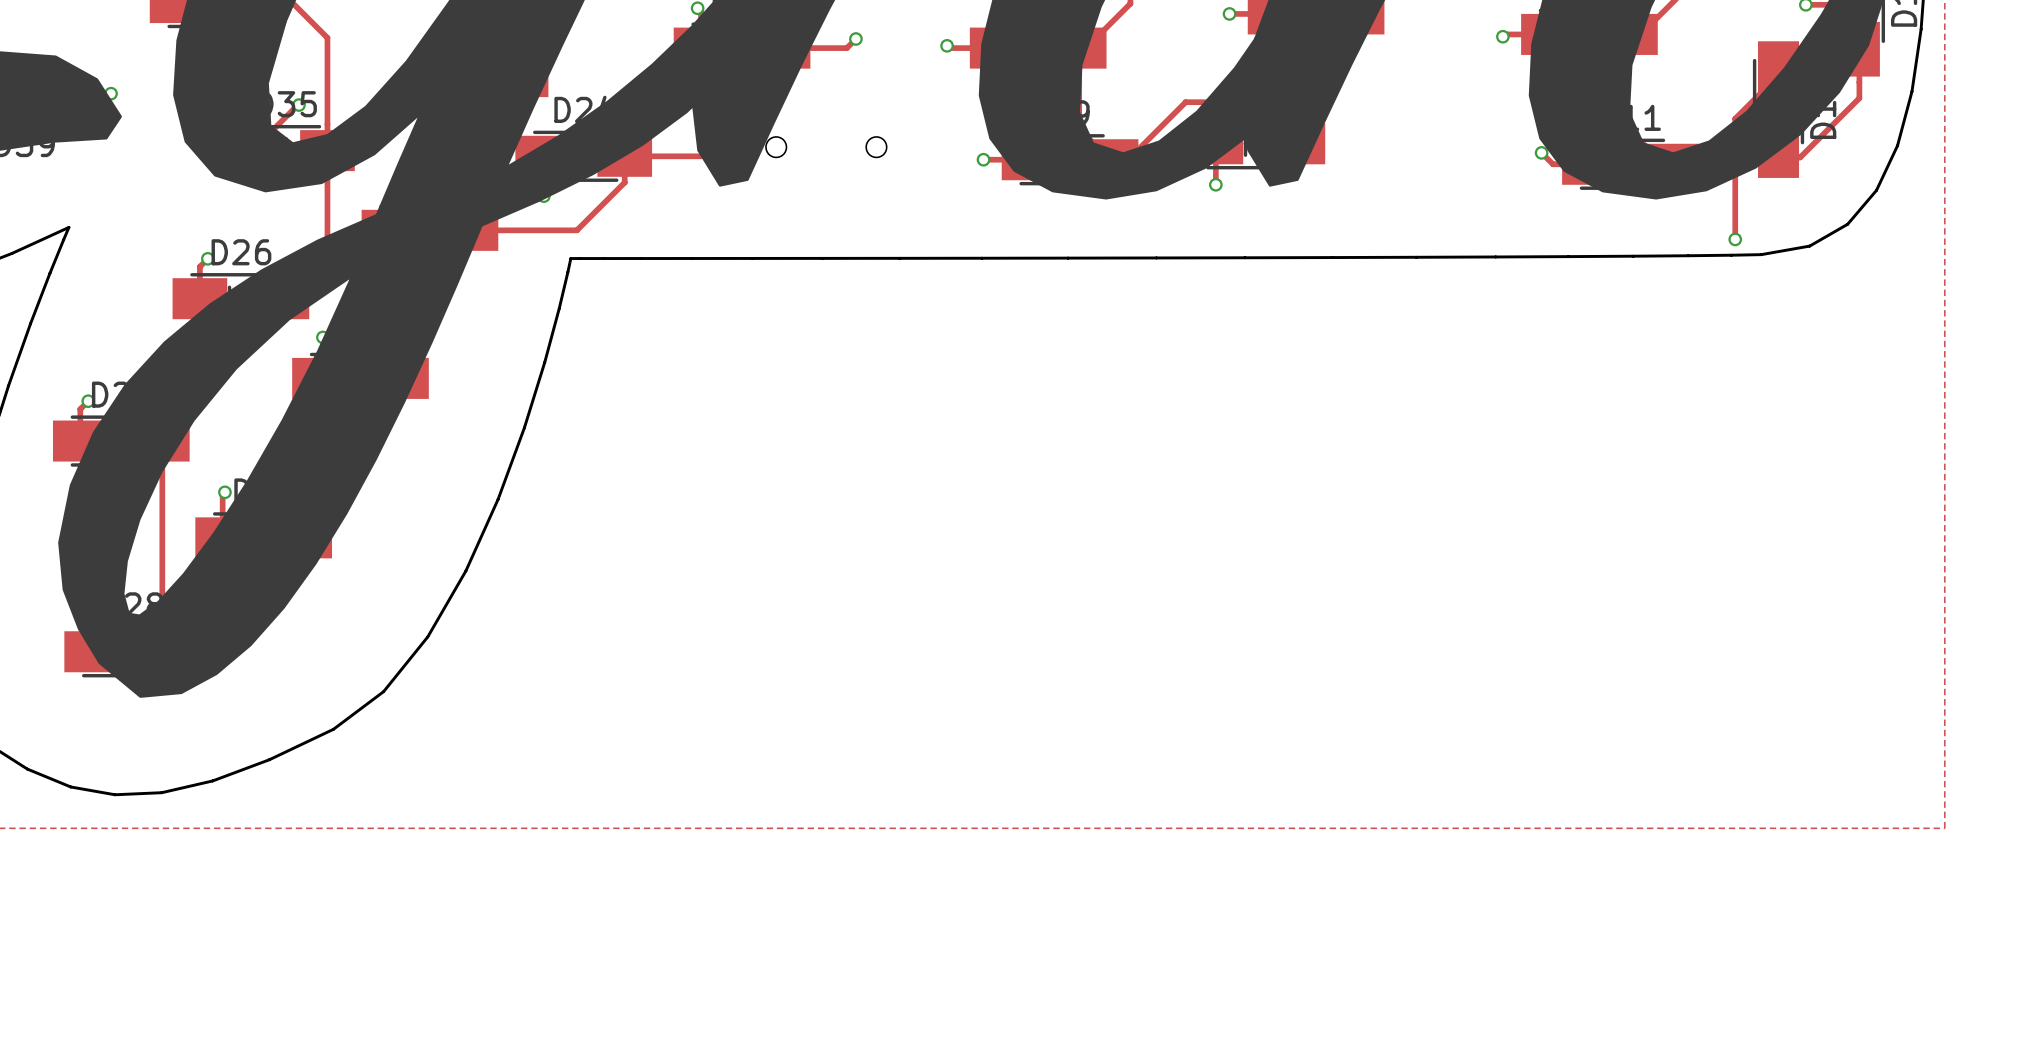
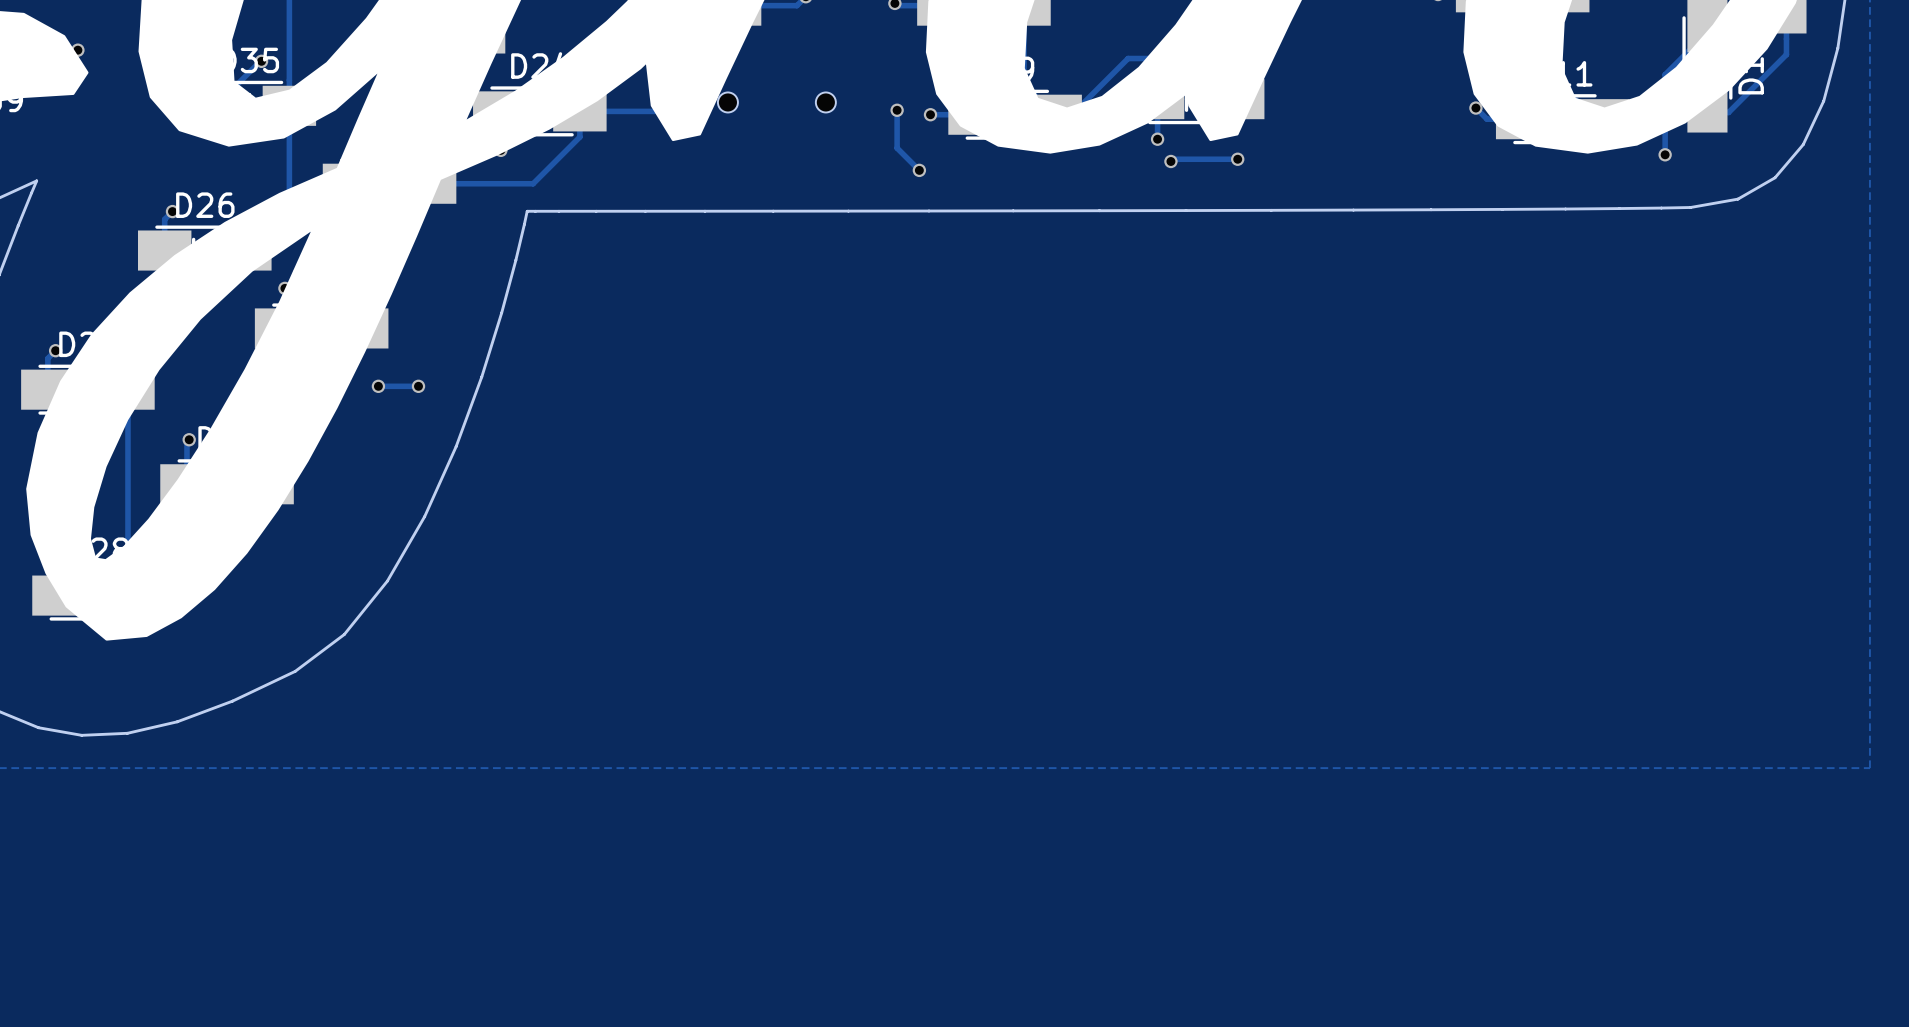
track: none -> (897, 110) (897, 148) (919, 170)
via: none -> (897, 110)
track: (1735, 200) (1735, 239) -> none
track: none -> (1237, 159) (1173, 159) (1170, 161)
via: none -> (1237, 159)
via: none -> (1170, 161)
via: none -> (919, 170)
via position: (1735, 239) -> (1665, 154)
track: none -> (378, 386) (418, 386)
via: none -> (378, 386)
via: none -> (418, 386)

